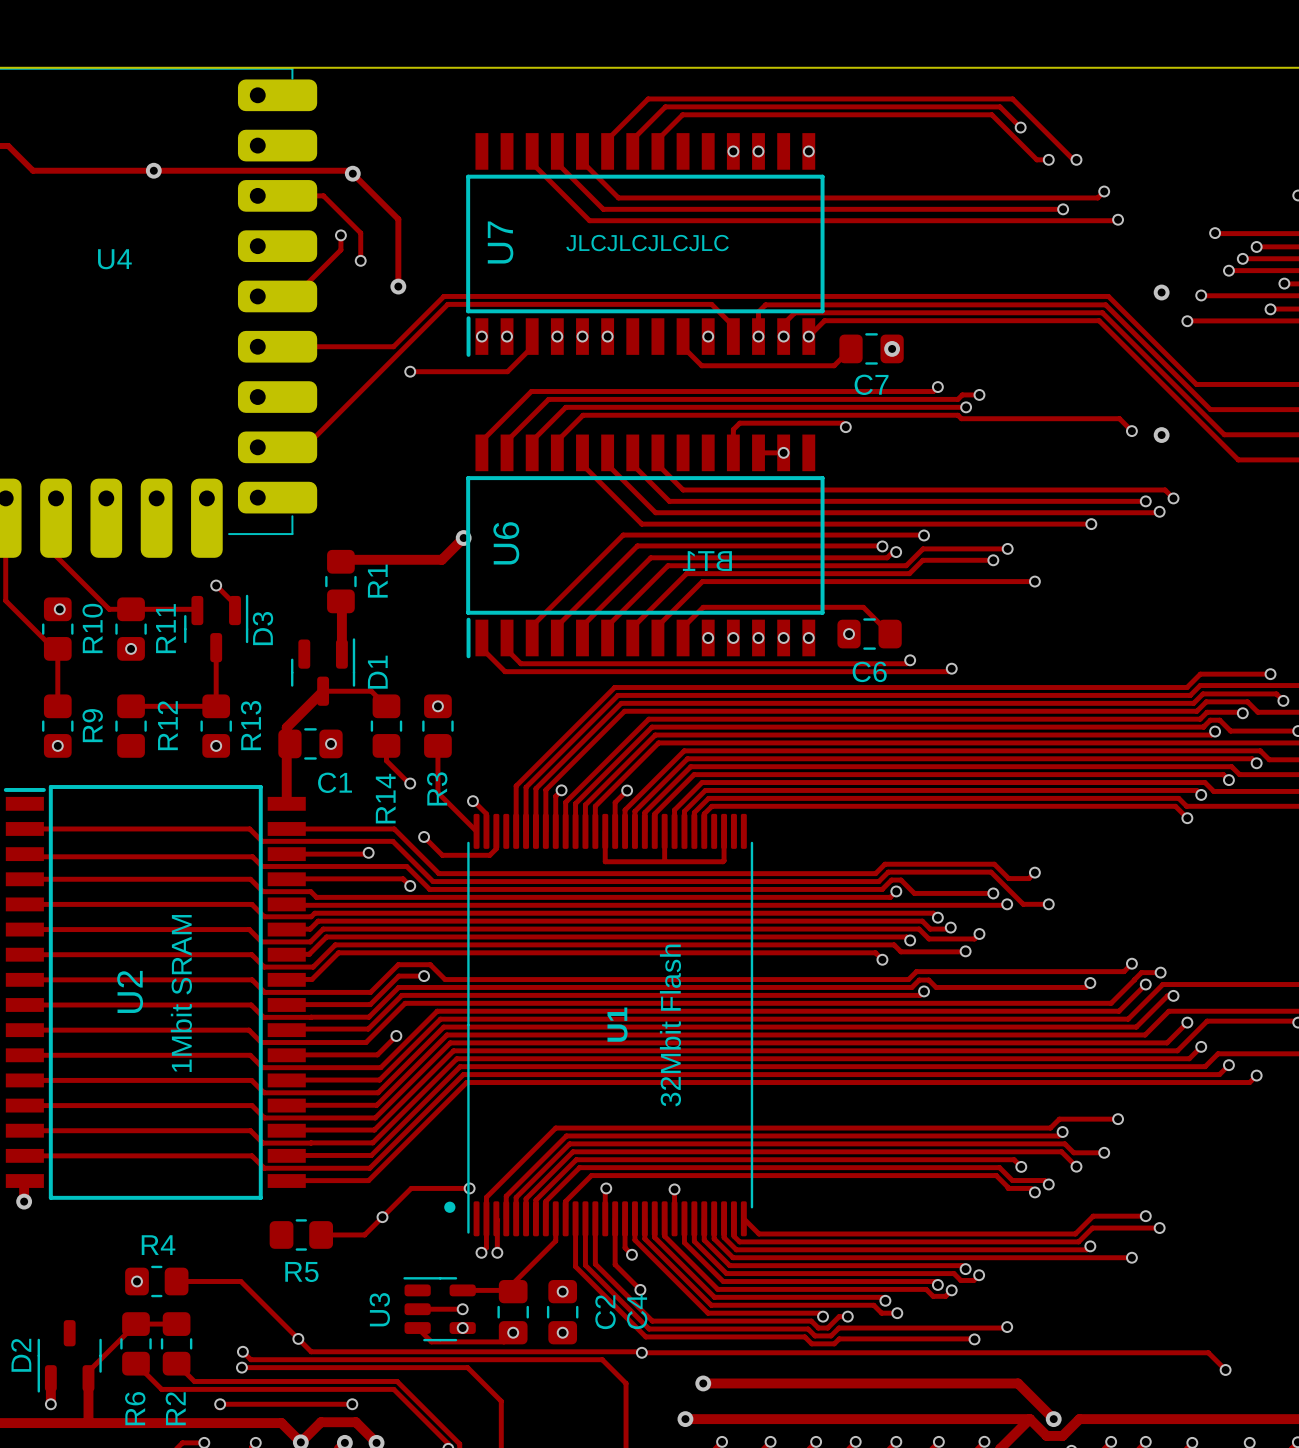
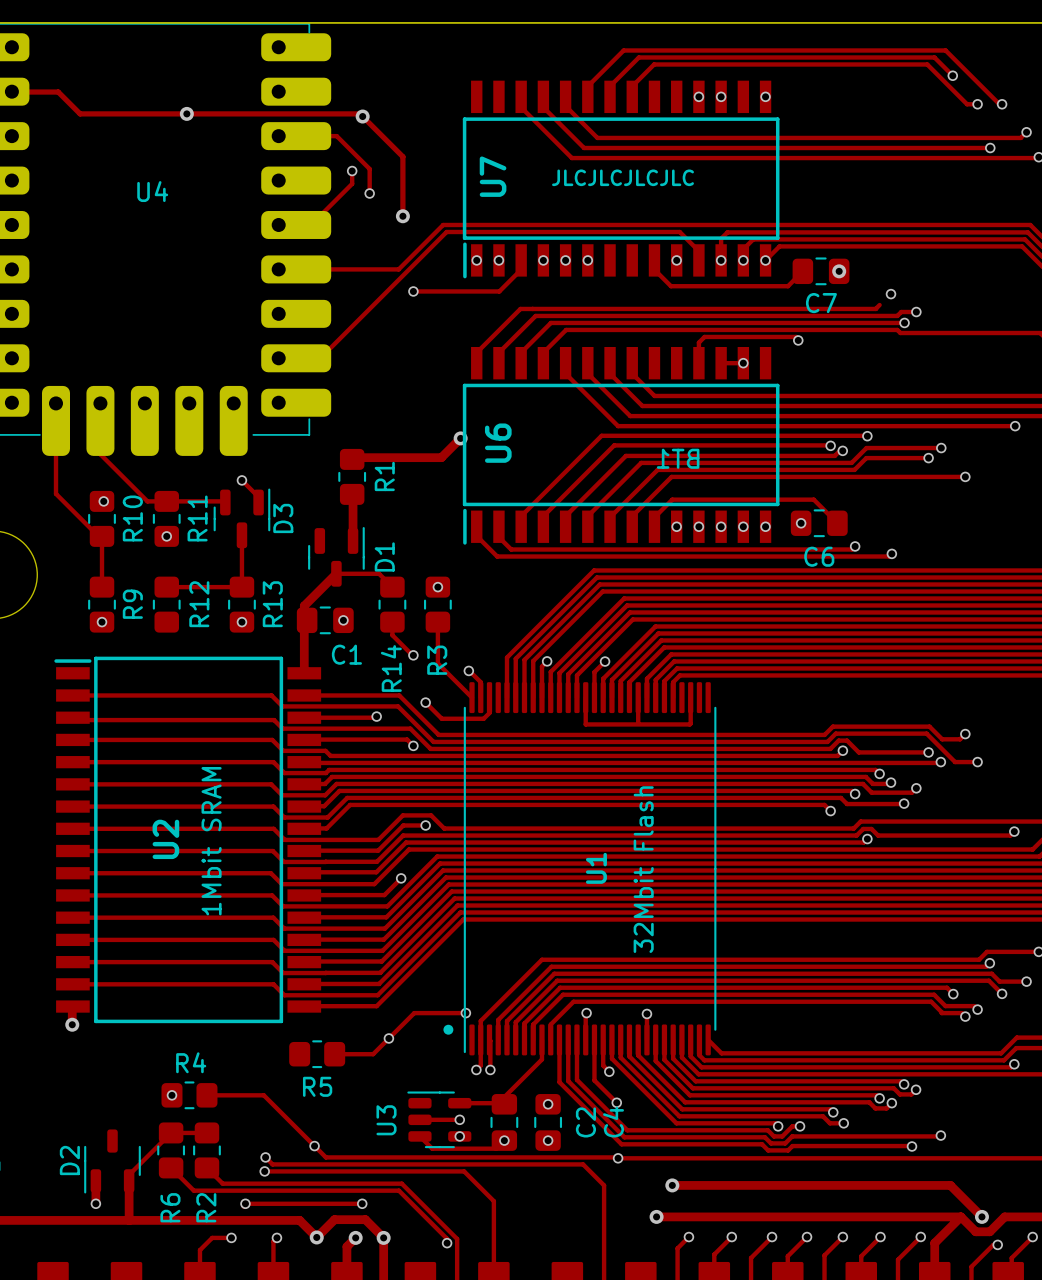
via position: (937, 387) -> (891, 294)

